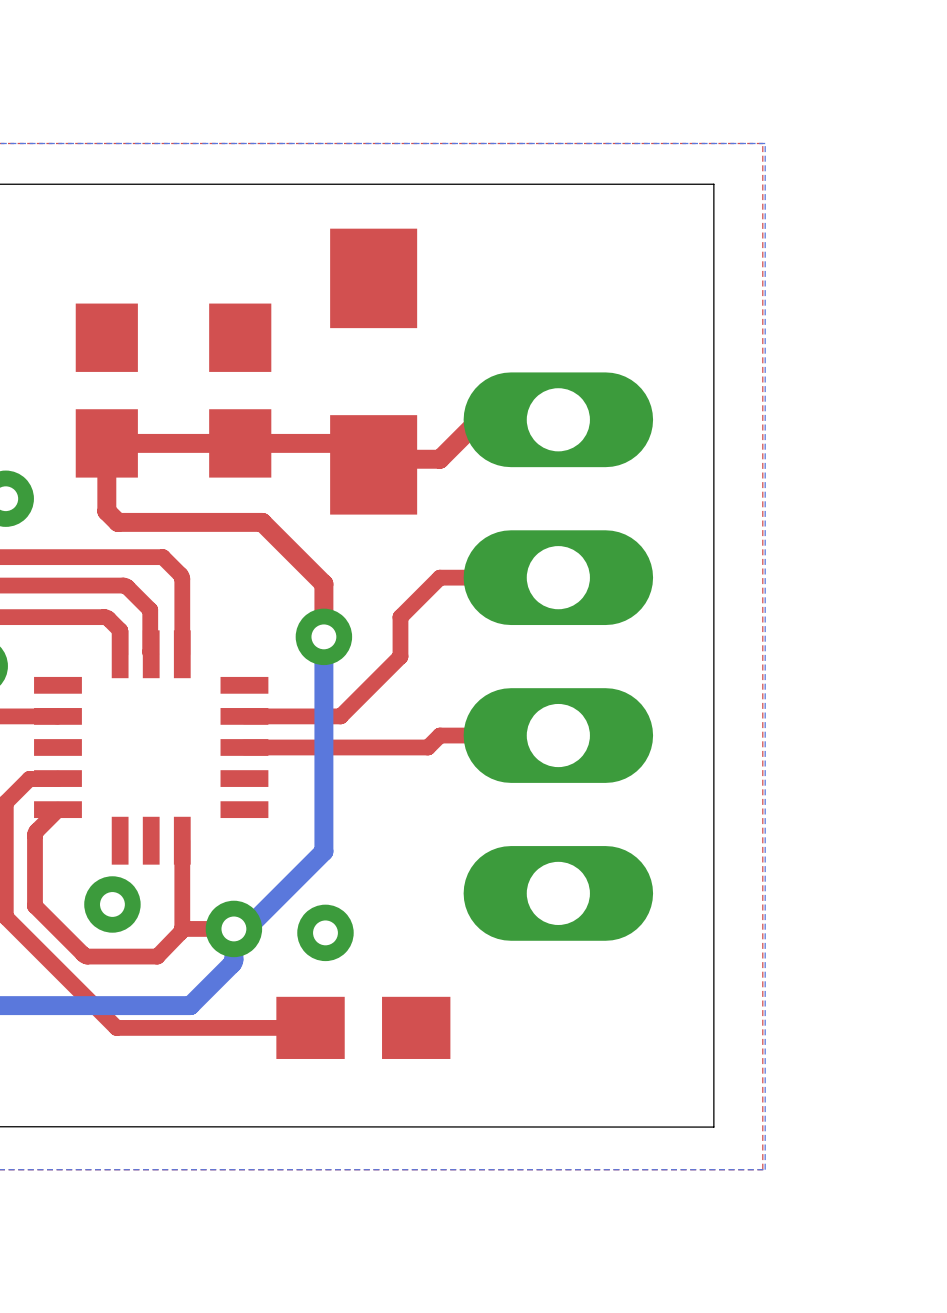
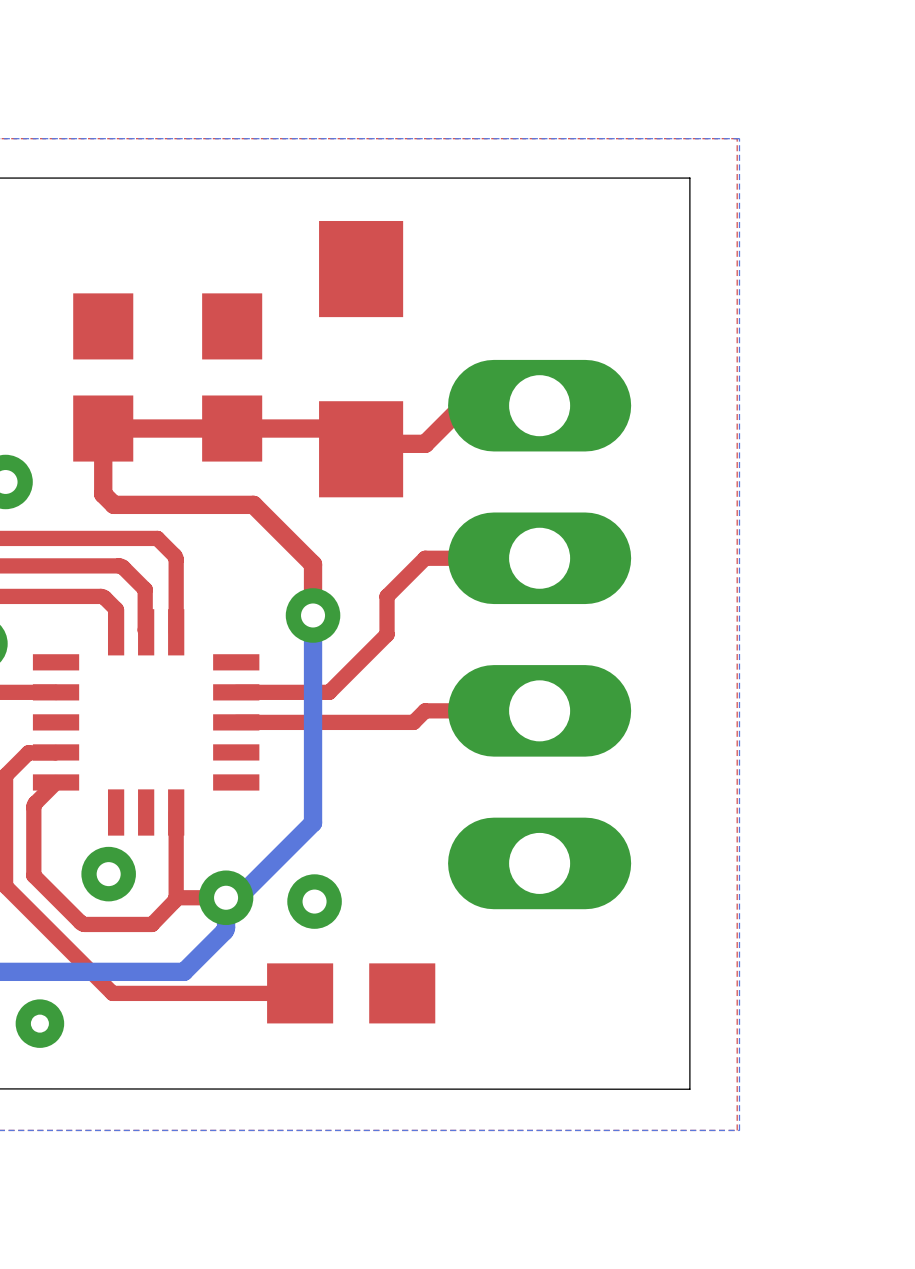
via: none -> (39, 1023)

